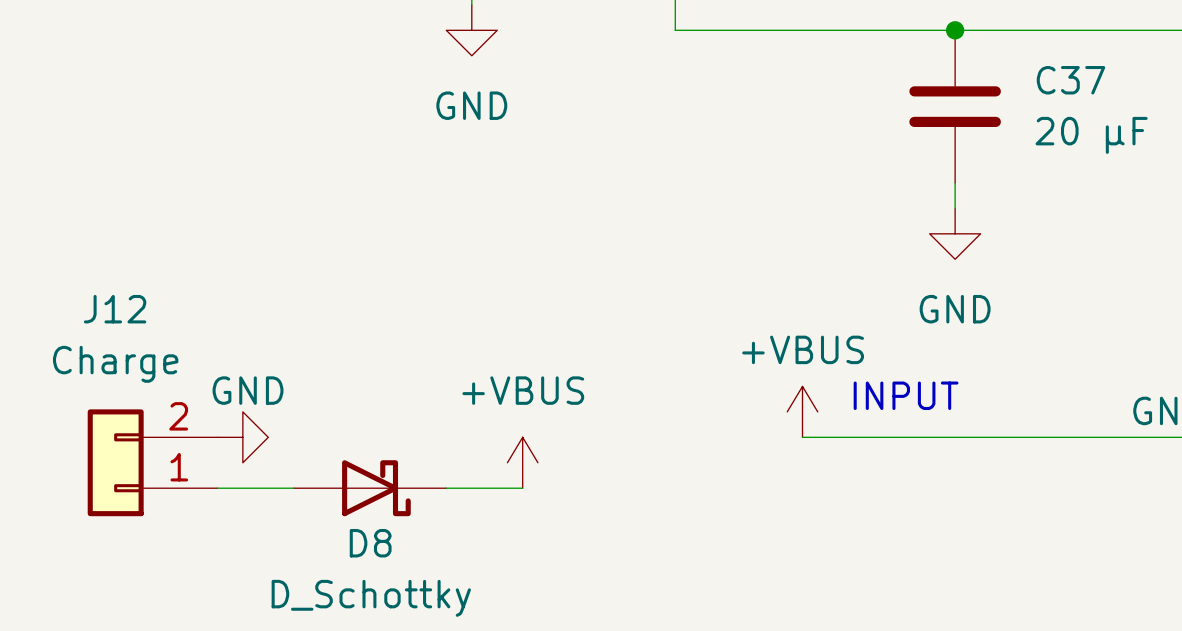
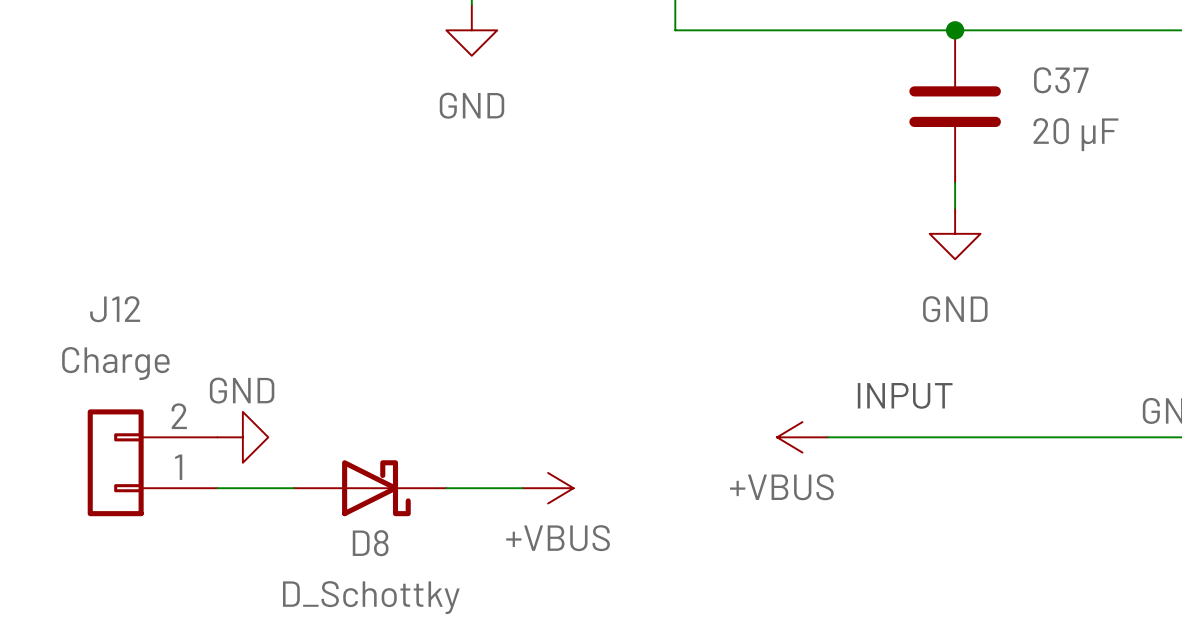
power symbol text position: +VBUS (803, 349) -> +VBUS (781, 487)
power symbol text position: +VBUS (523, 390) -> +VBUS (558, 538)
power symbol rotation: 0° (802, 411) -> 90° counterclockwise (802, 437)
power symbol rotation: 0° (522, 462) -> 90° clockwise (548, 488)
power symbol position: +VBUS (522, 462) -> +VBUS (548, 488)

